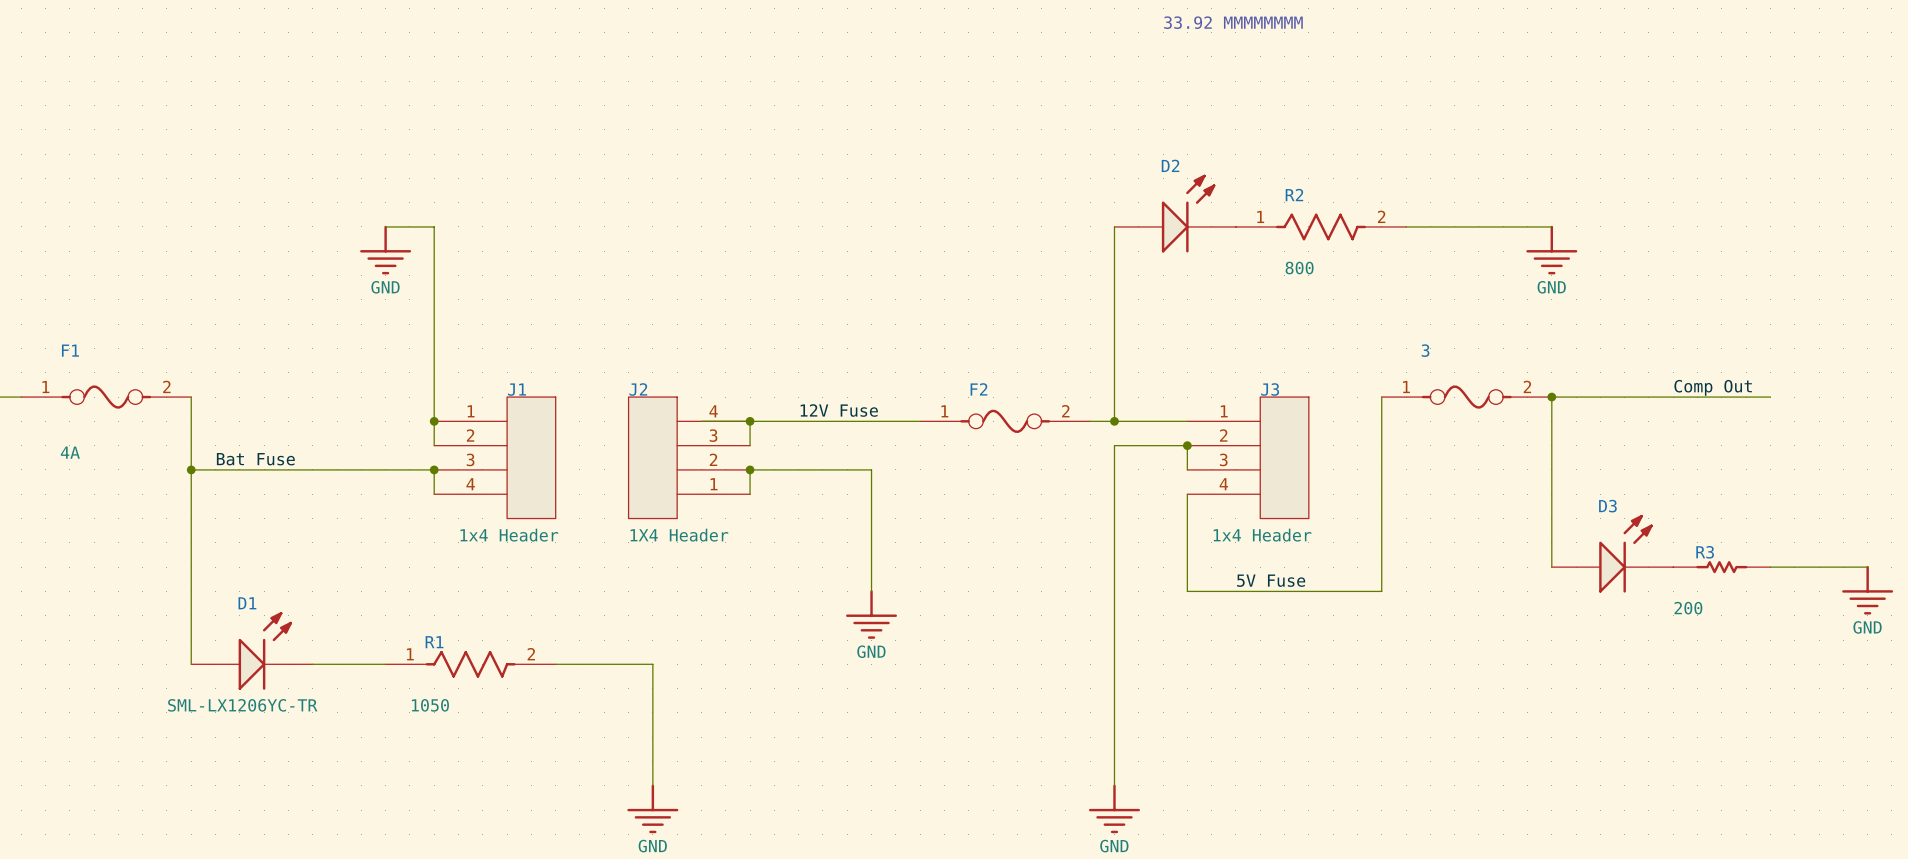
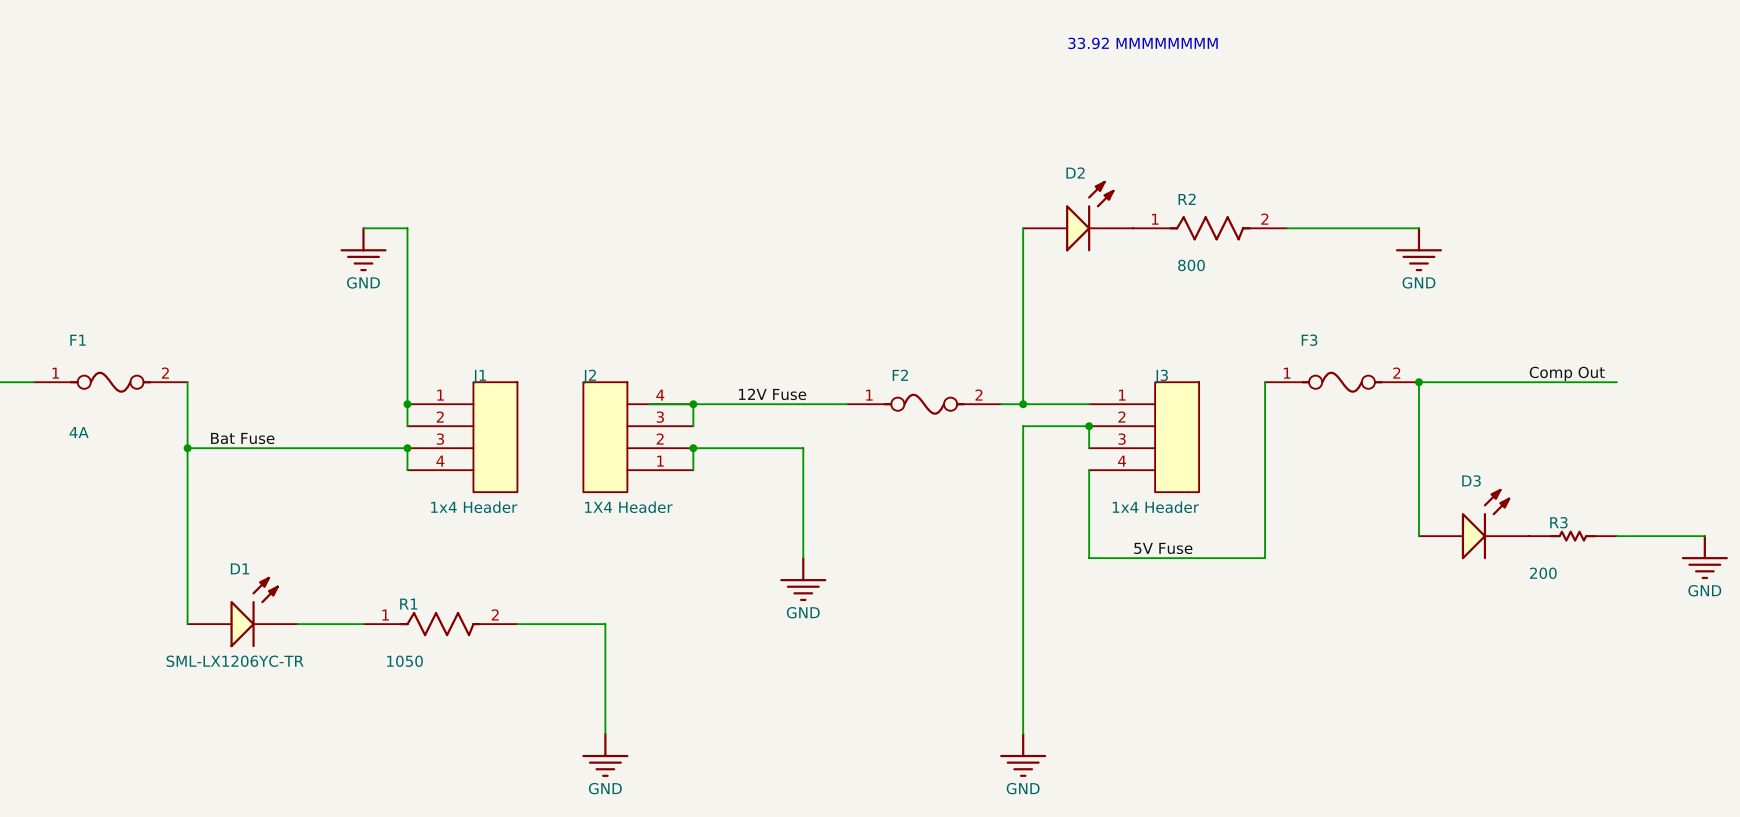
3 name: 3 (1425, 350) -> F3 (1309, 340)

